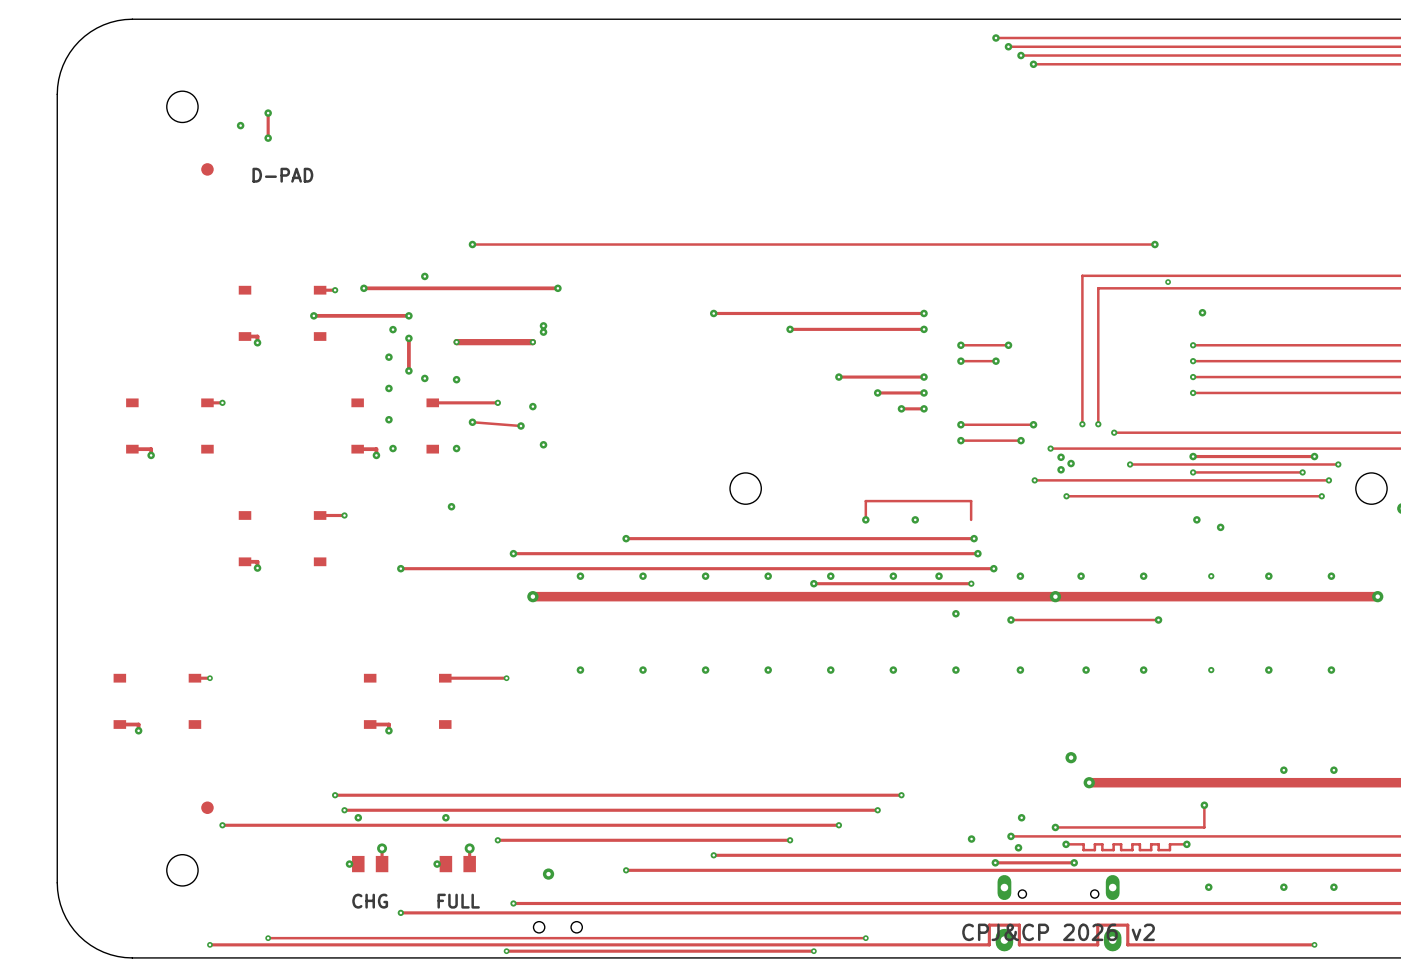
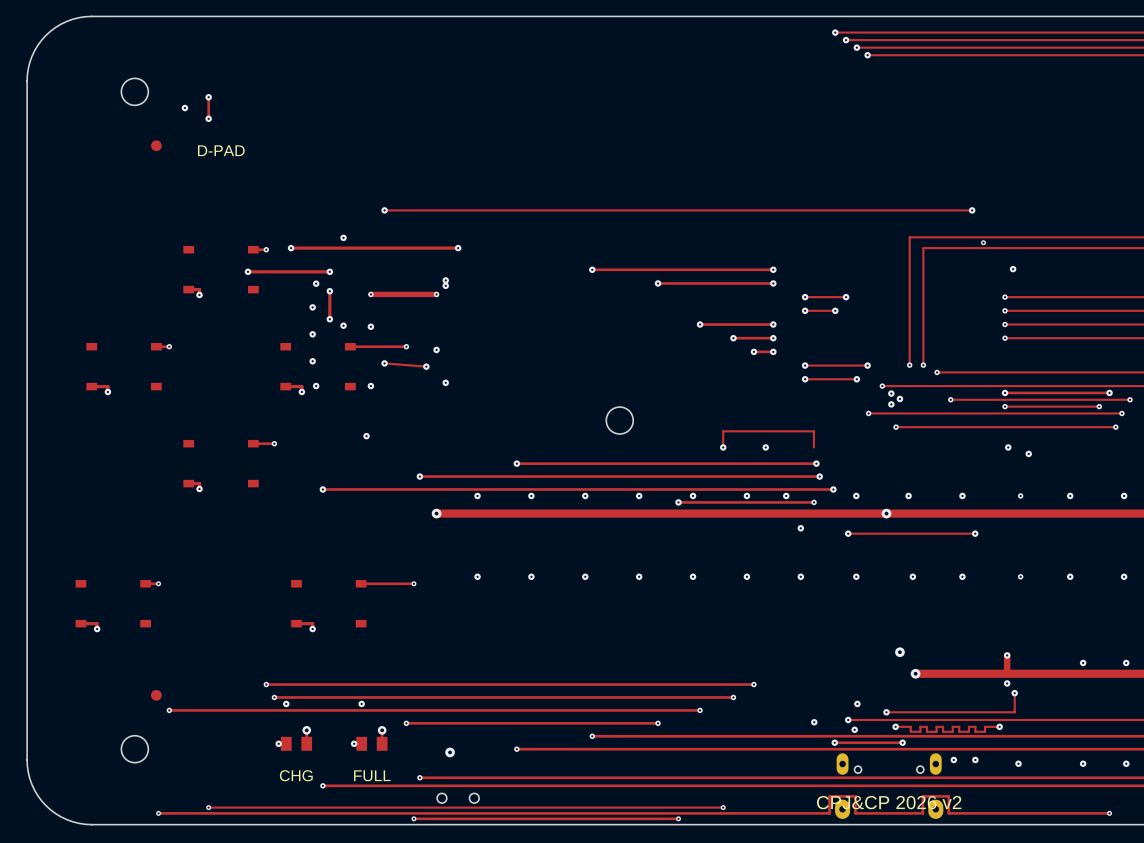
track: none -> (1007, 655) (1007, 673)
via: none -> (1007, 655)
via: none -> (1007, 683)
via: none -> (953, 759)
via: none -> (975, 759)

